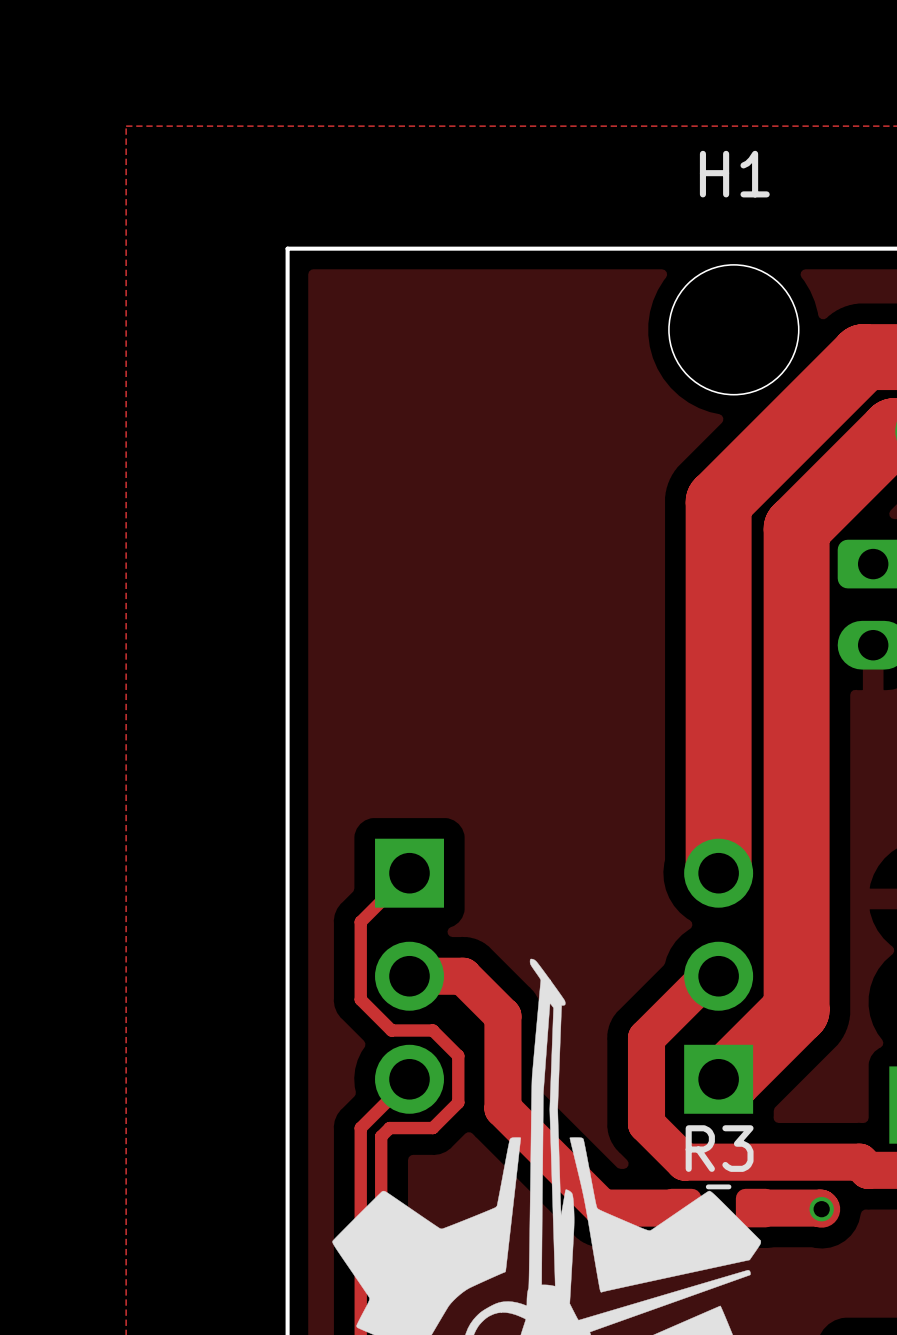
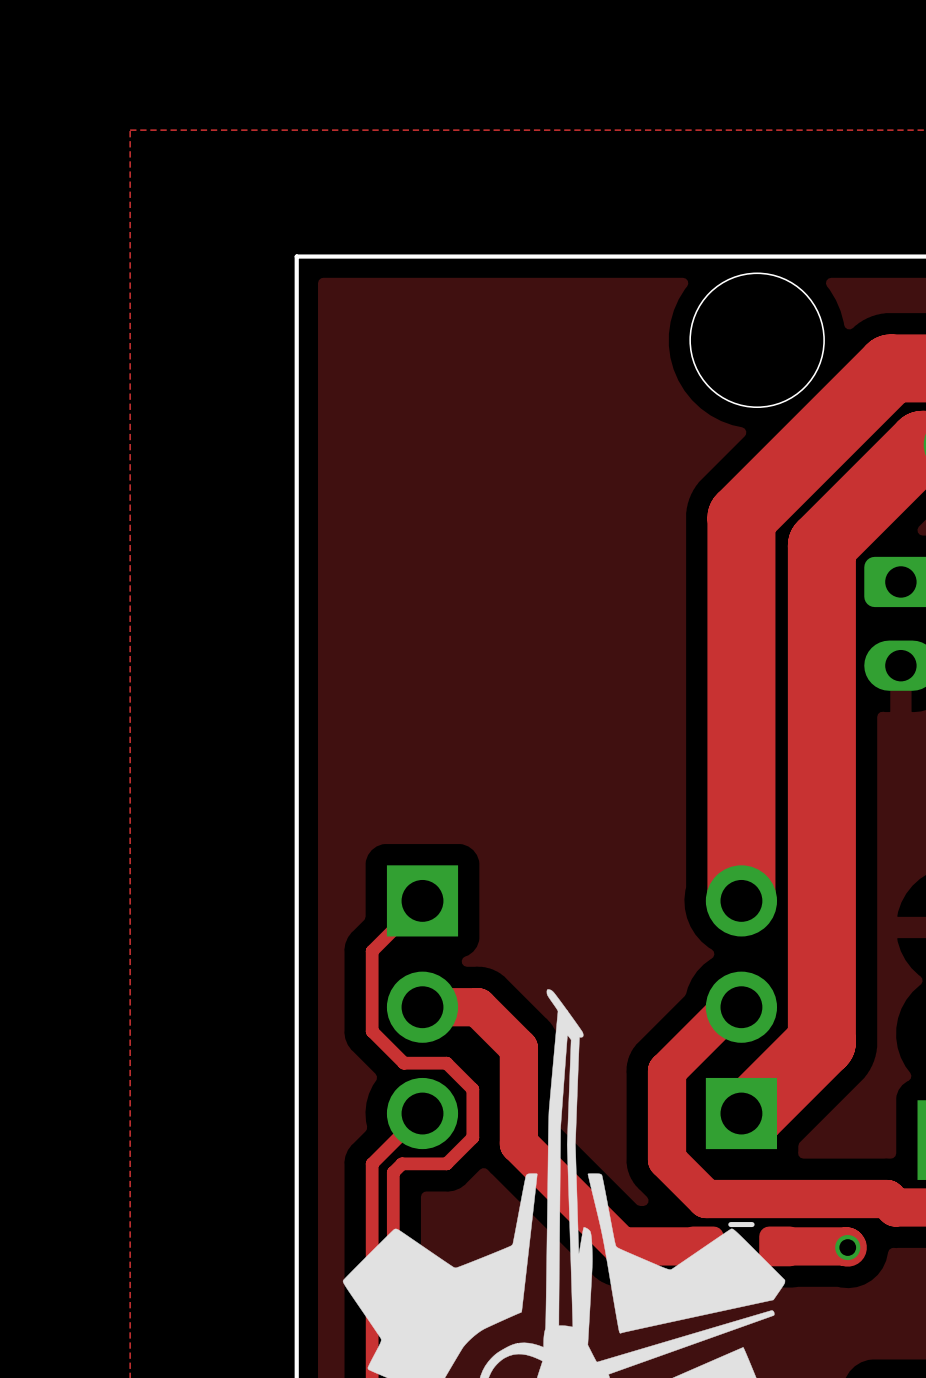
H1 name: H1 (734, 174) -> none
R3 name: R3 (719, 1148) -> none

